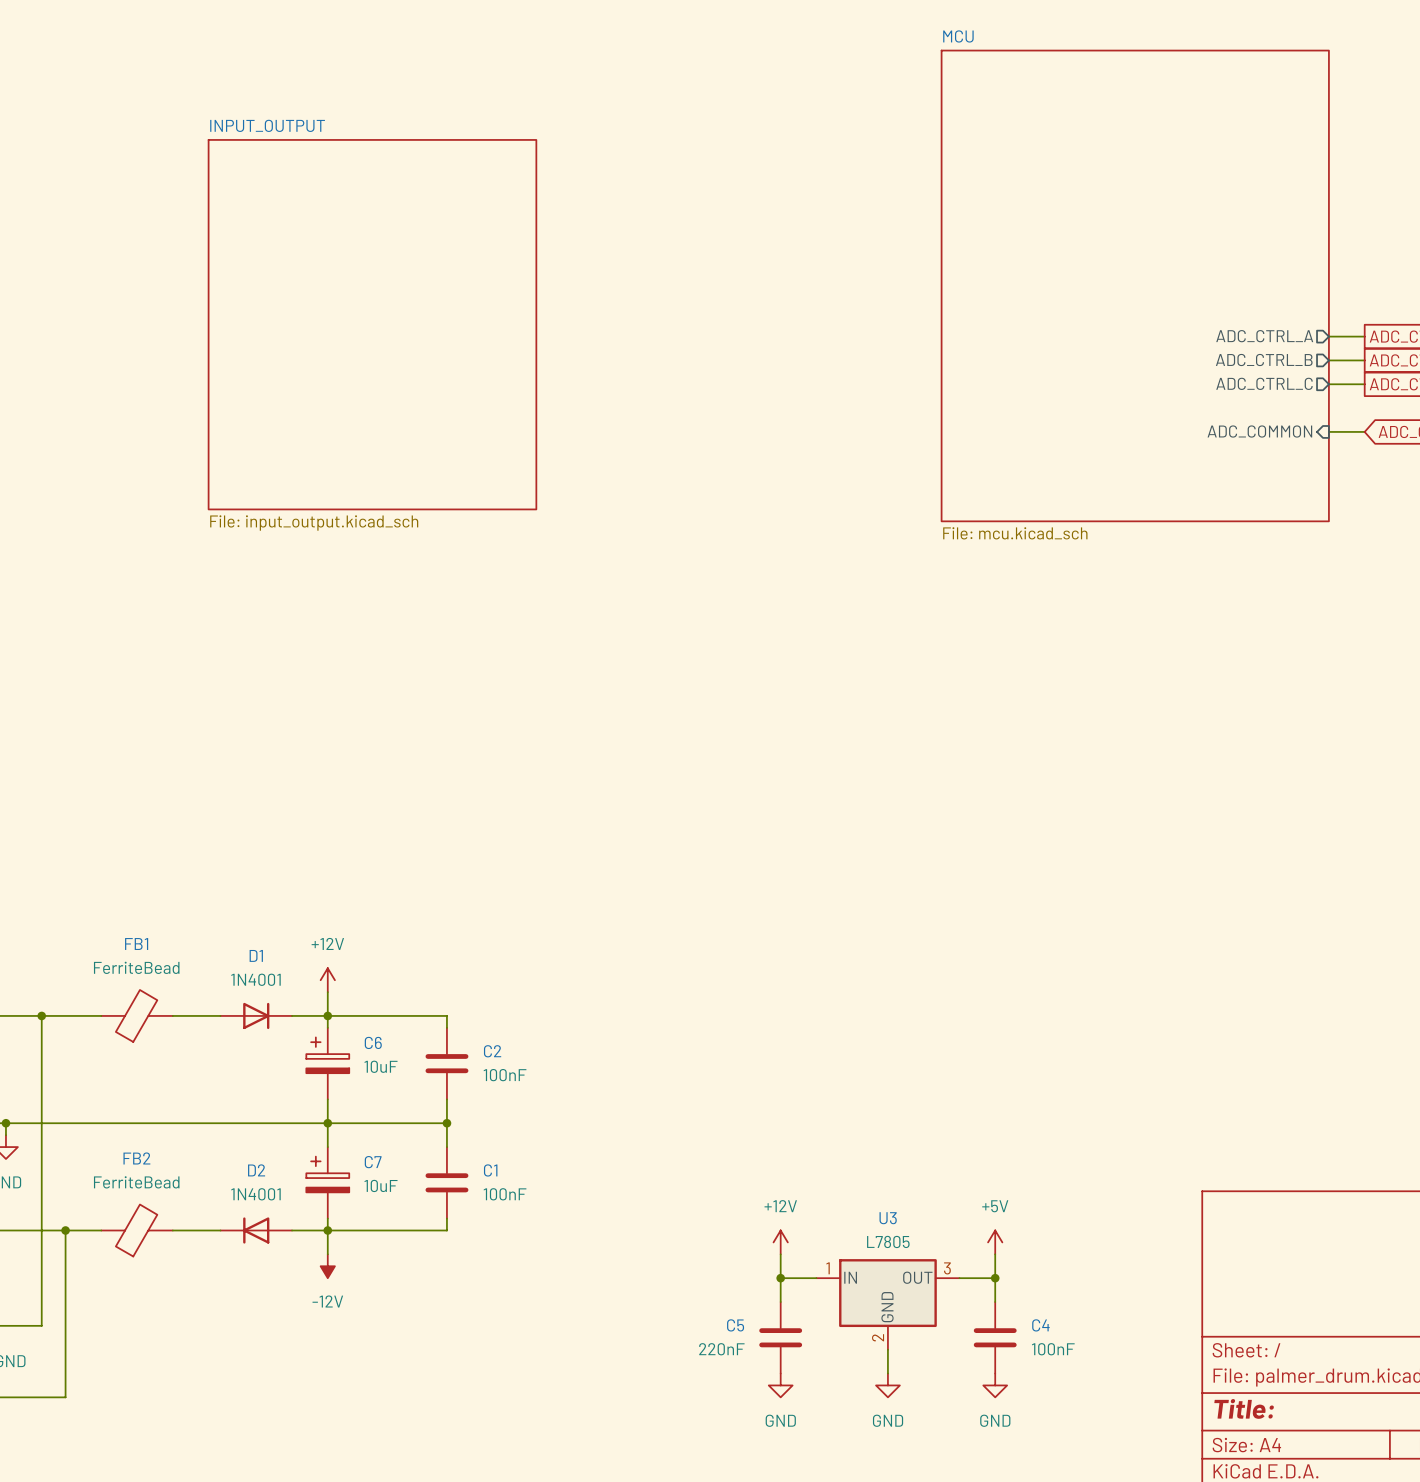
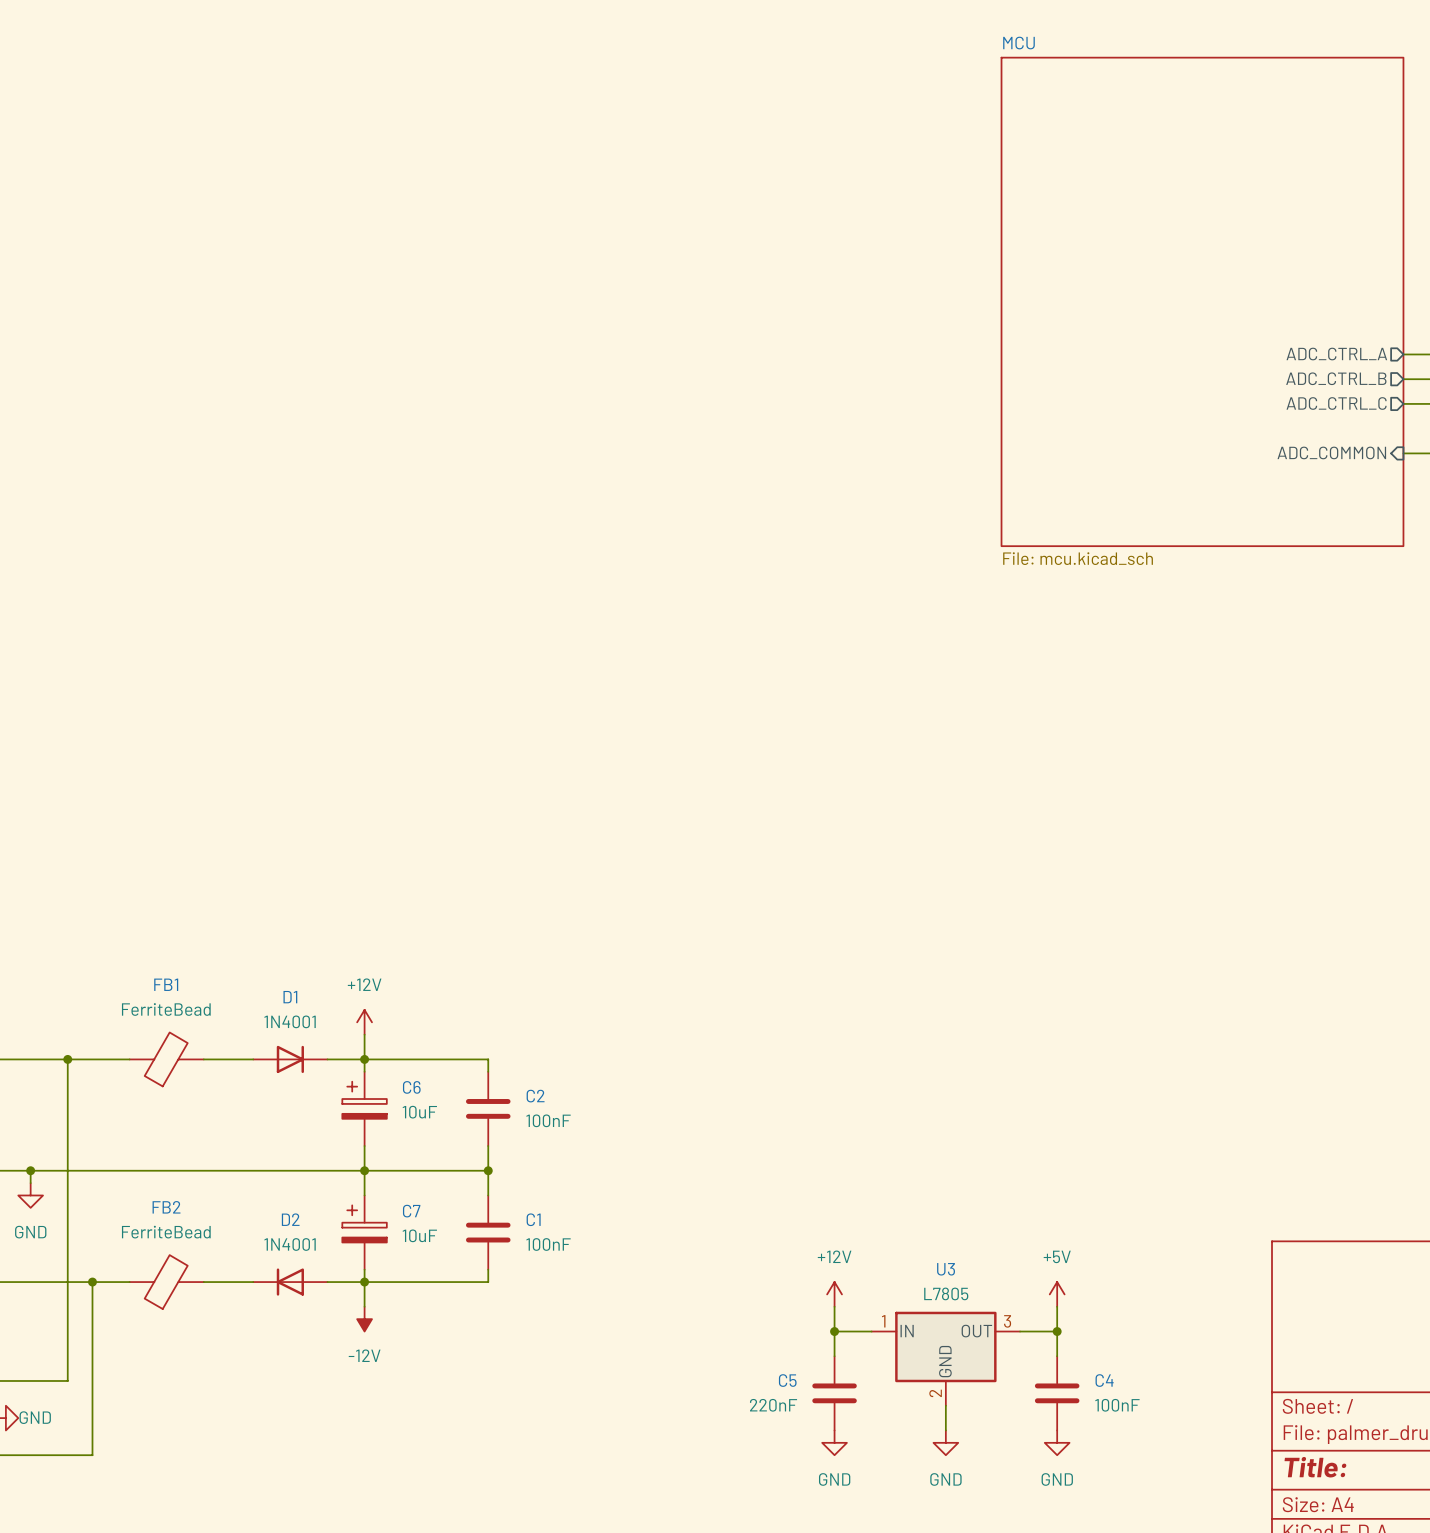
sheet INPUT_OUTPUT: File: input_output.kicad_sch (372, 324) -> none

